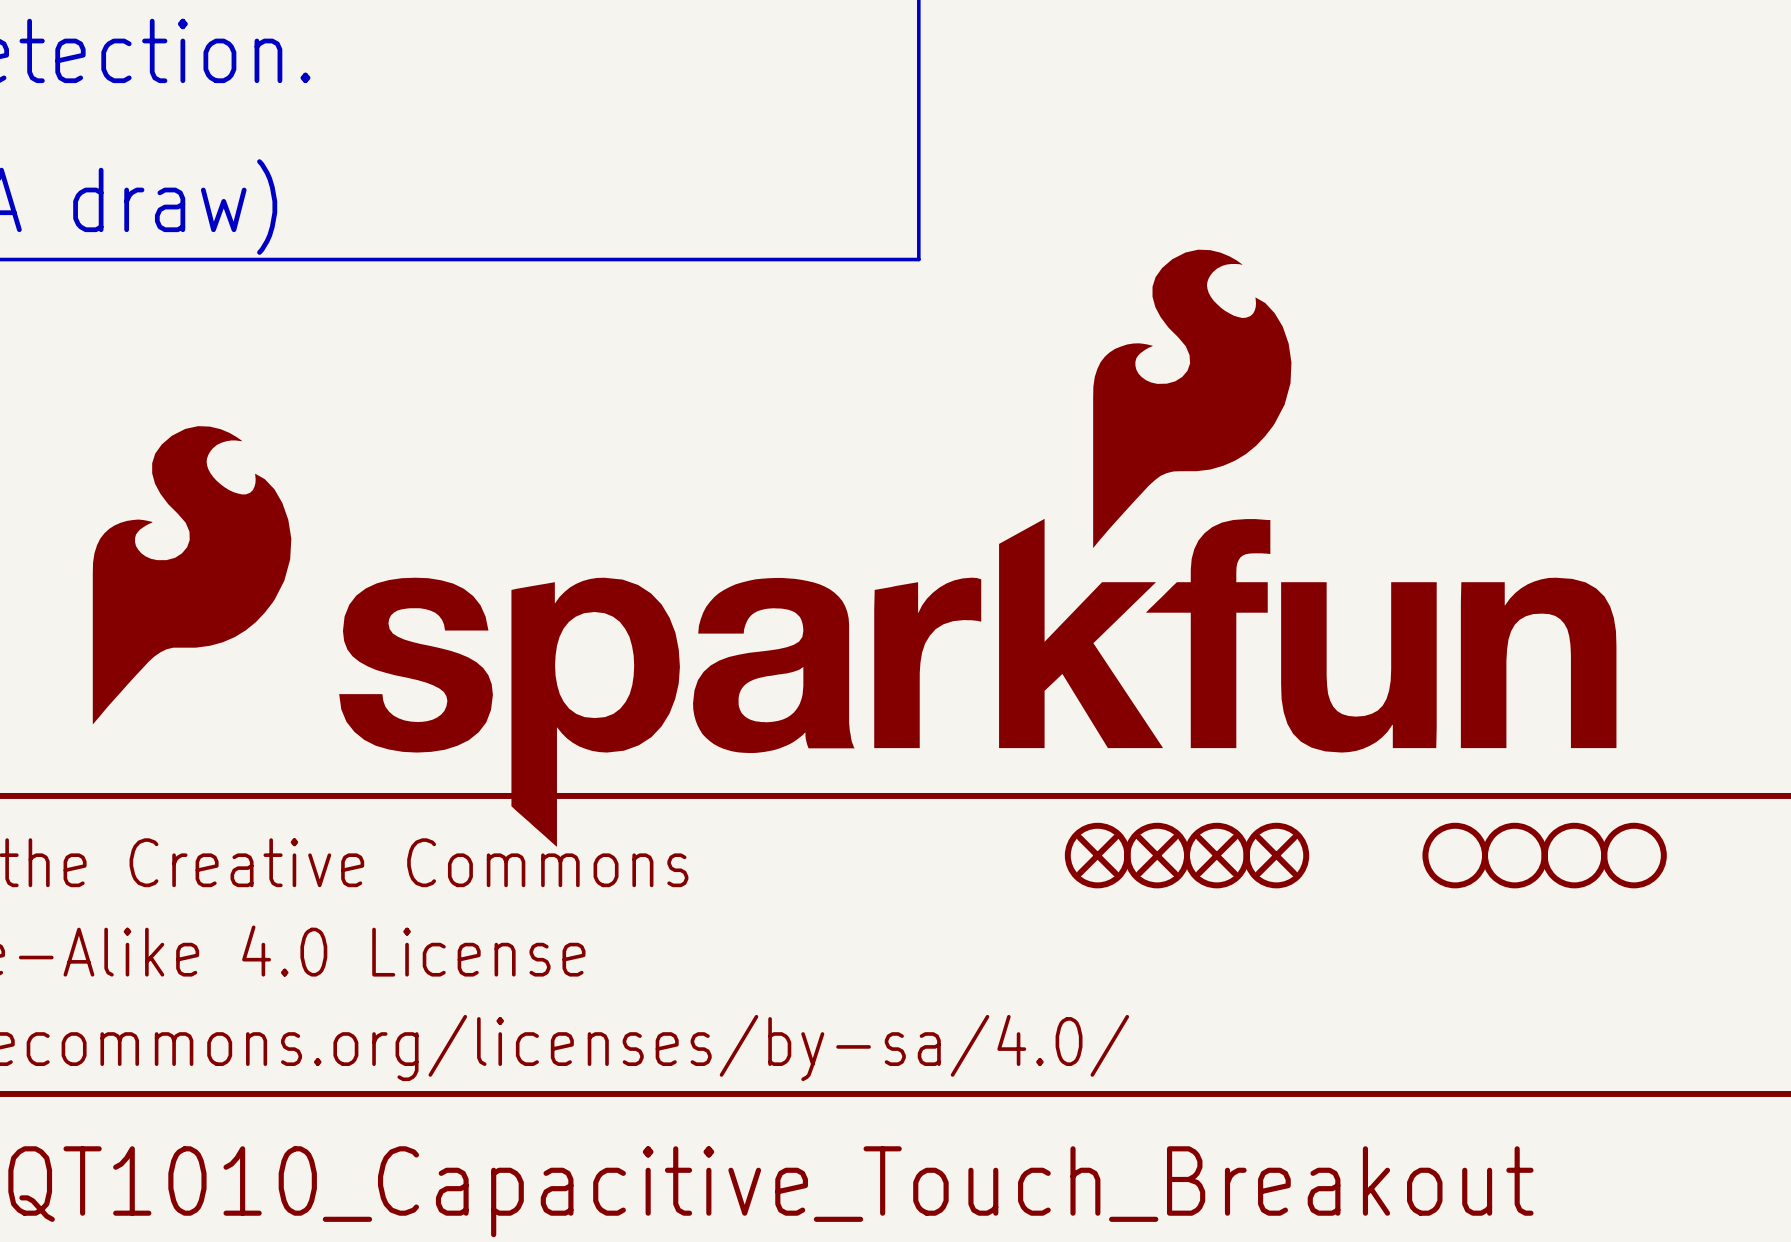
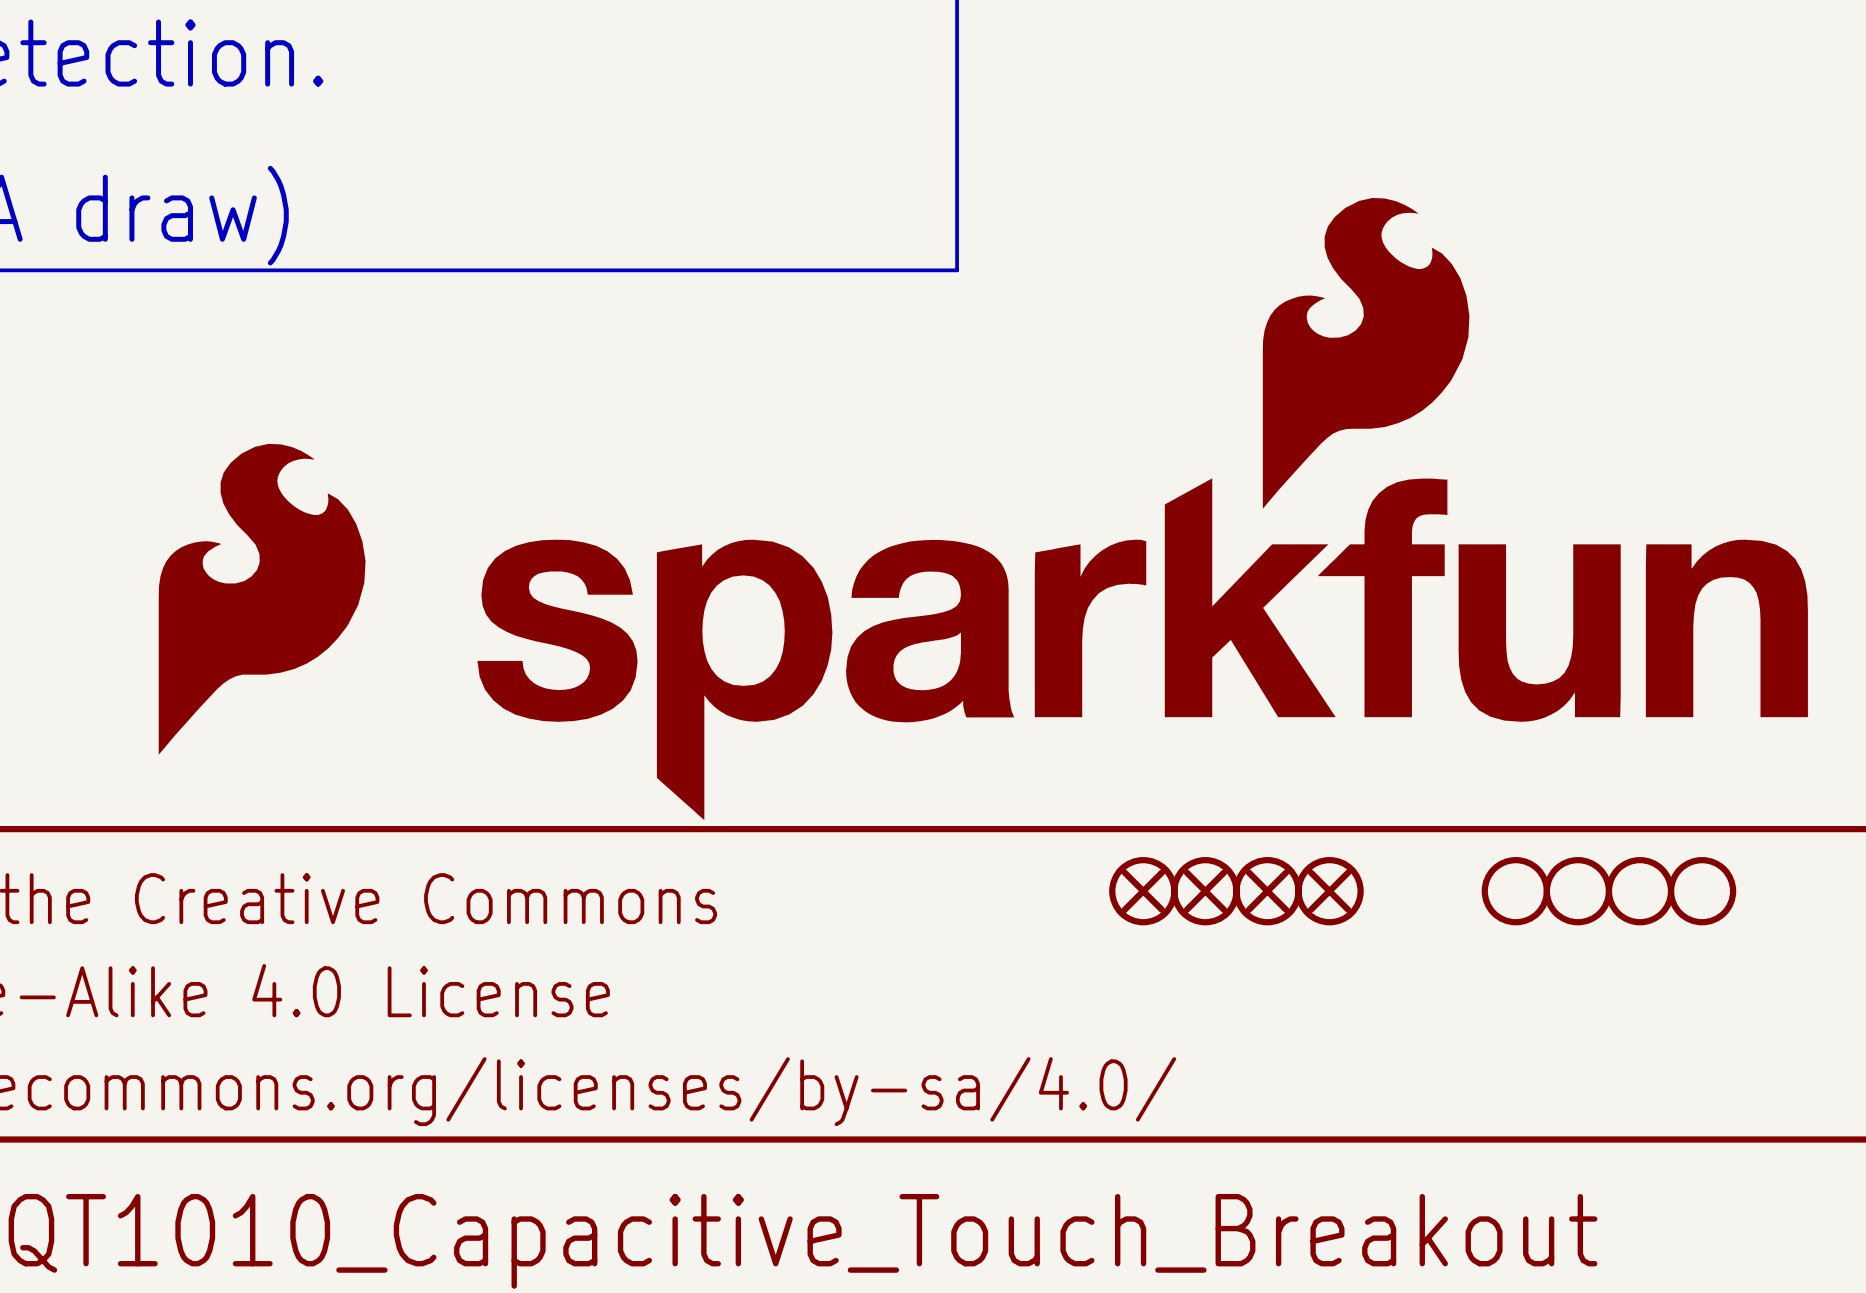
part position: (977, 548) -> (1142, 509)
part position: (192, 575) -> (262, 599)

